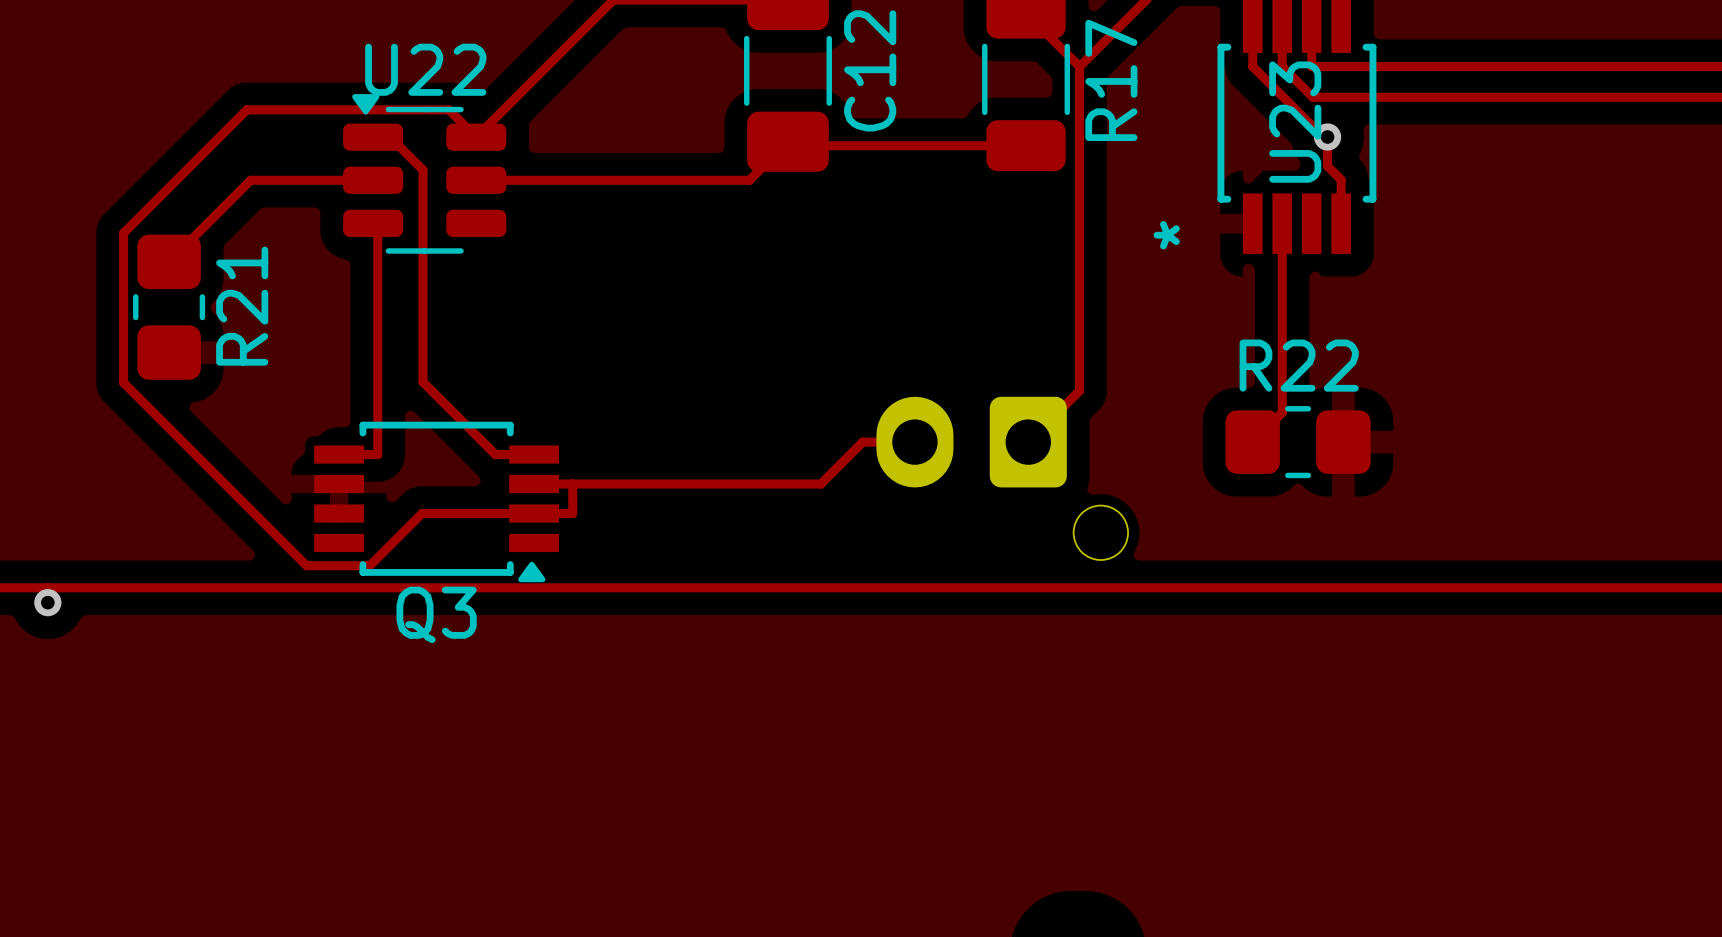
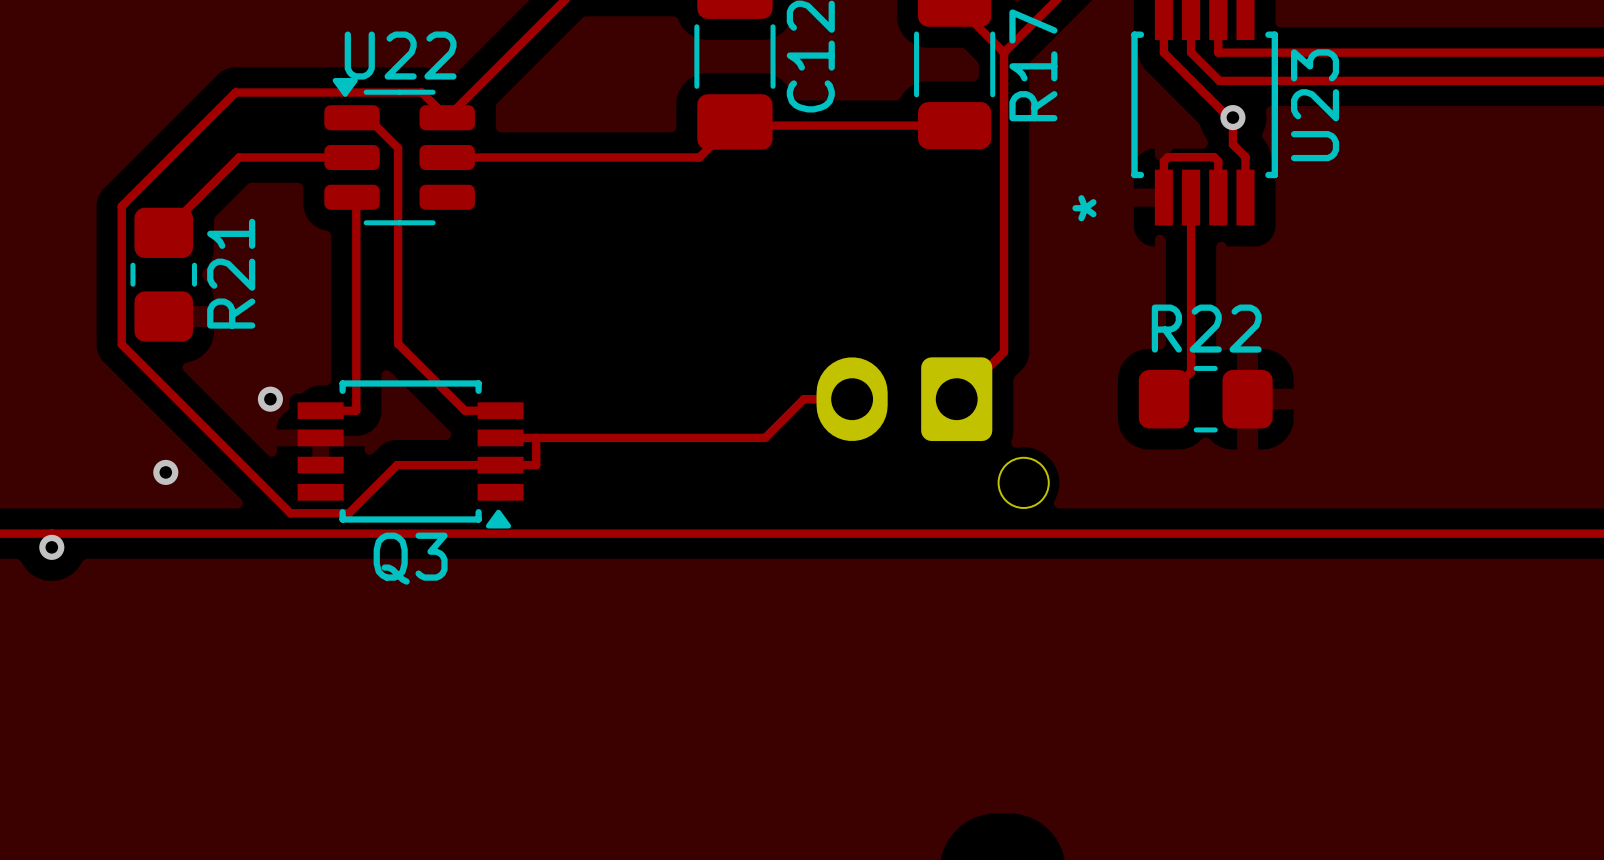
U23 name position: U23 (1295, 122) -> U23 (1315, 105)
track: none -> (1163, 197) (1163, 161) (1168, 157) (1214, 157) (1218, 161) (1218, 197)
via: none -> (270, 399)
via: none -> (165, 472)

